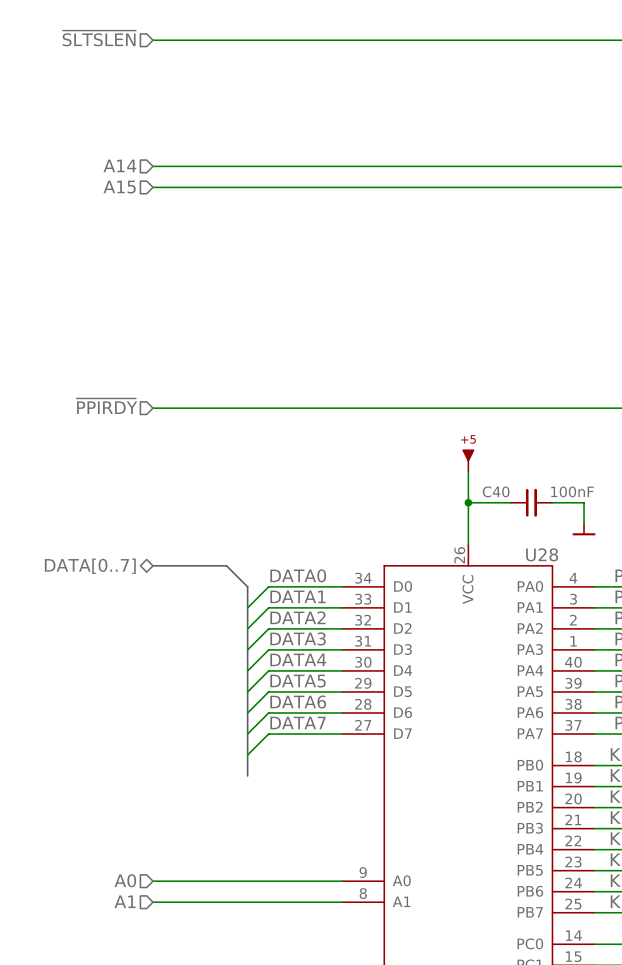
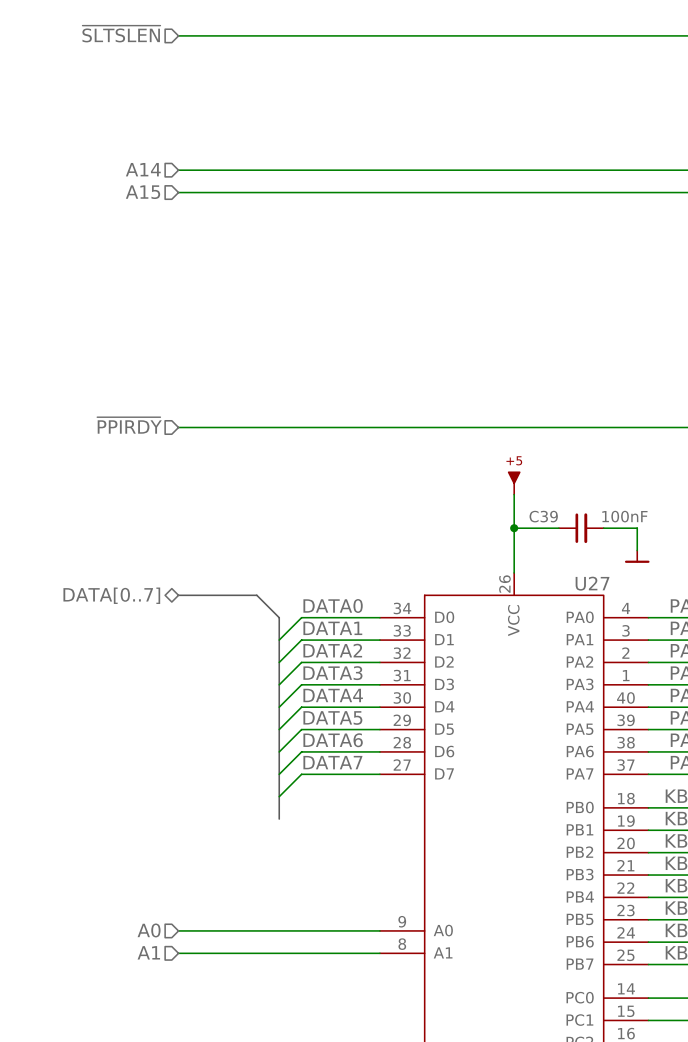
C40 name: C40 (496, 491) -> C39 (543, 516)
U28 name: U28 (542, 554) -> U27 (592, 583)

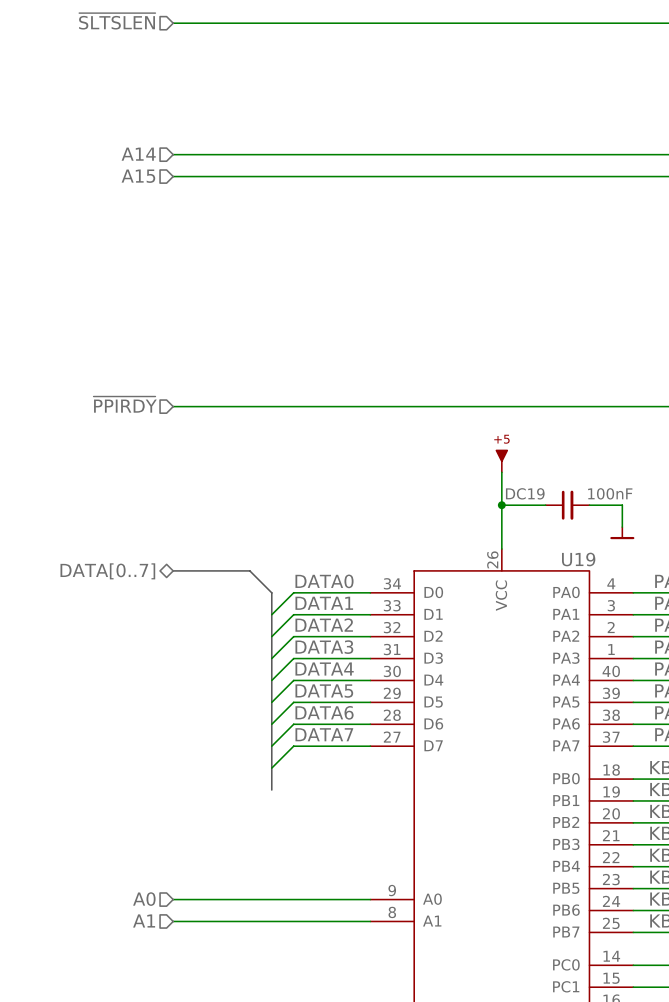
C39 name: C39 (543, 516) -> DC19 (525, 493)
U27 name: U27 (592, 583) -> U19 (578, 559)

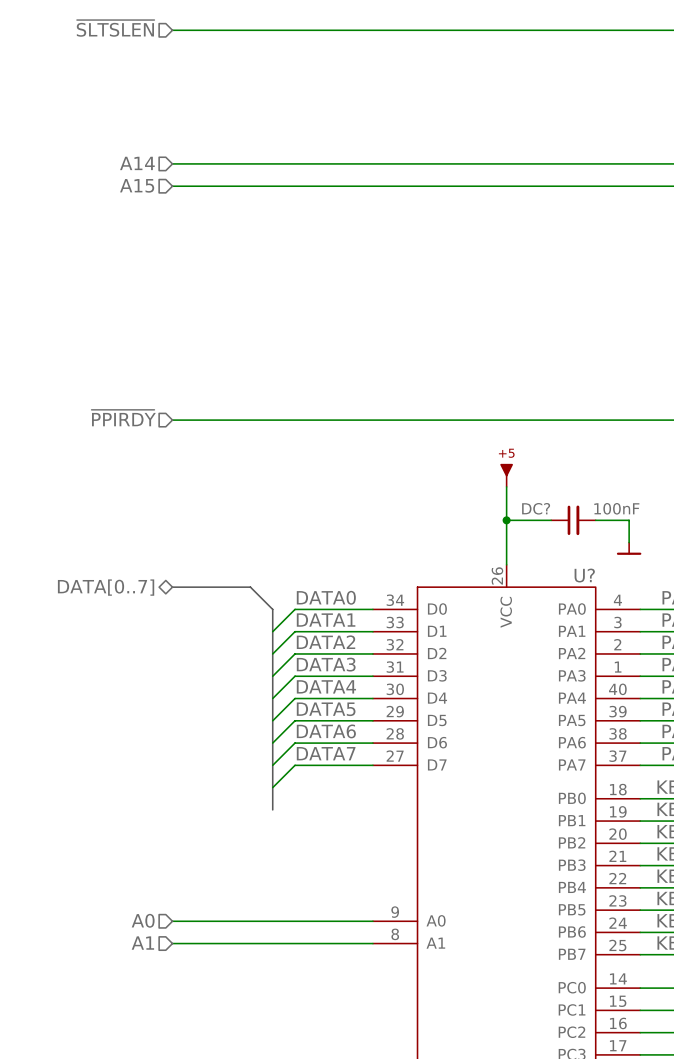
DC19 name: DC19 (525, 493) -> DC? (536, 508)
U19 name: U19 (578, 559) -> U? (584, 575)

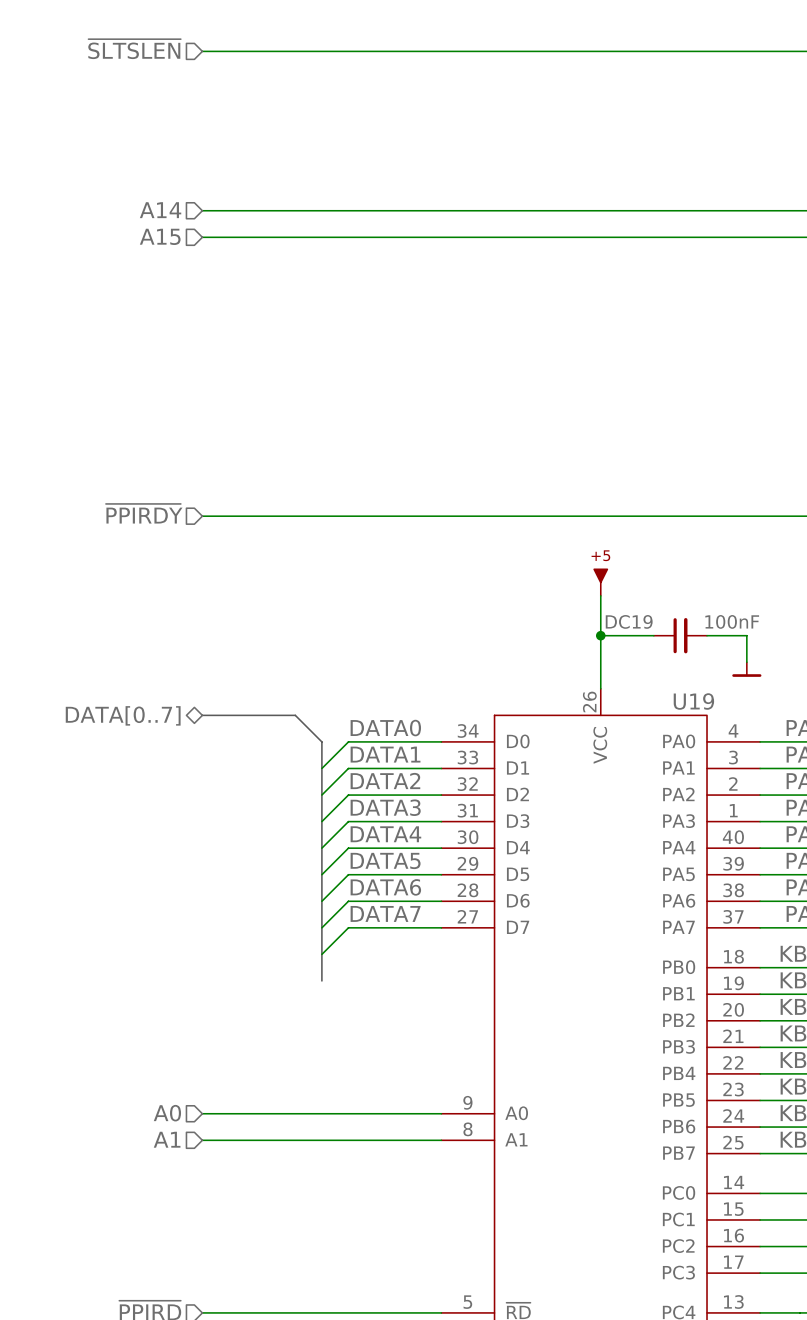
DC? name: DC? (536, 508) -> DC19 (629, 621)
U? name: U? (584, 575) -> U19 (693, 701)

